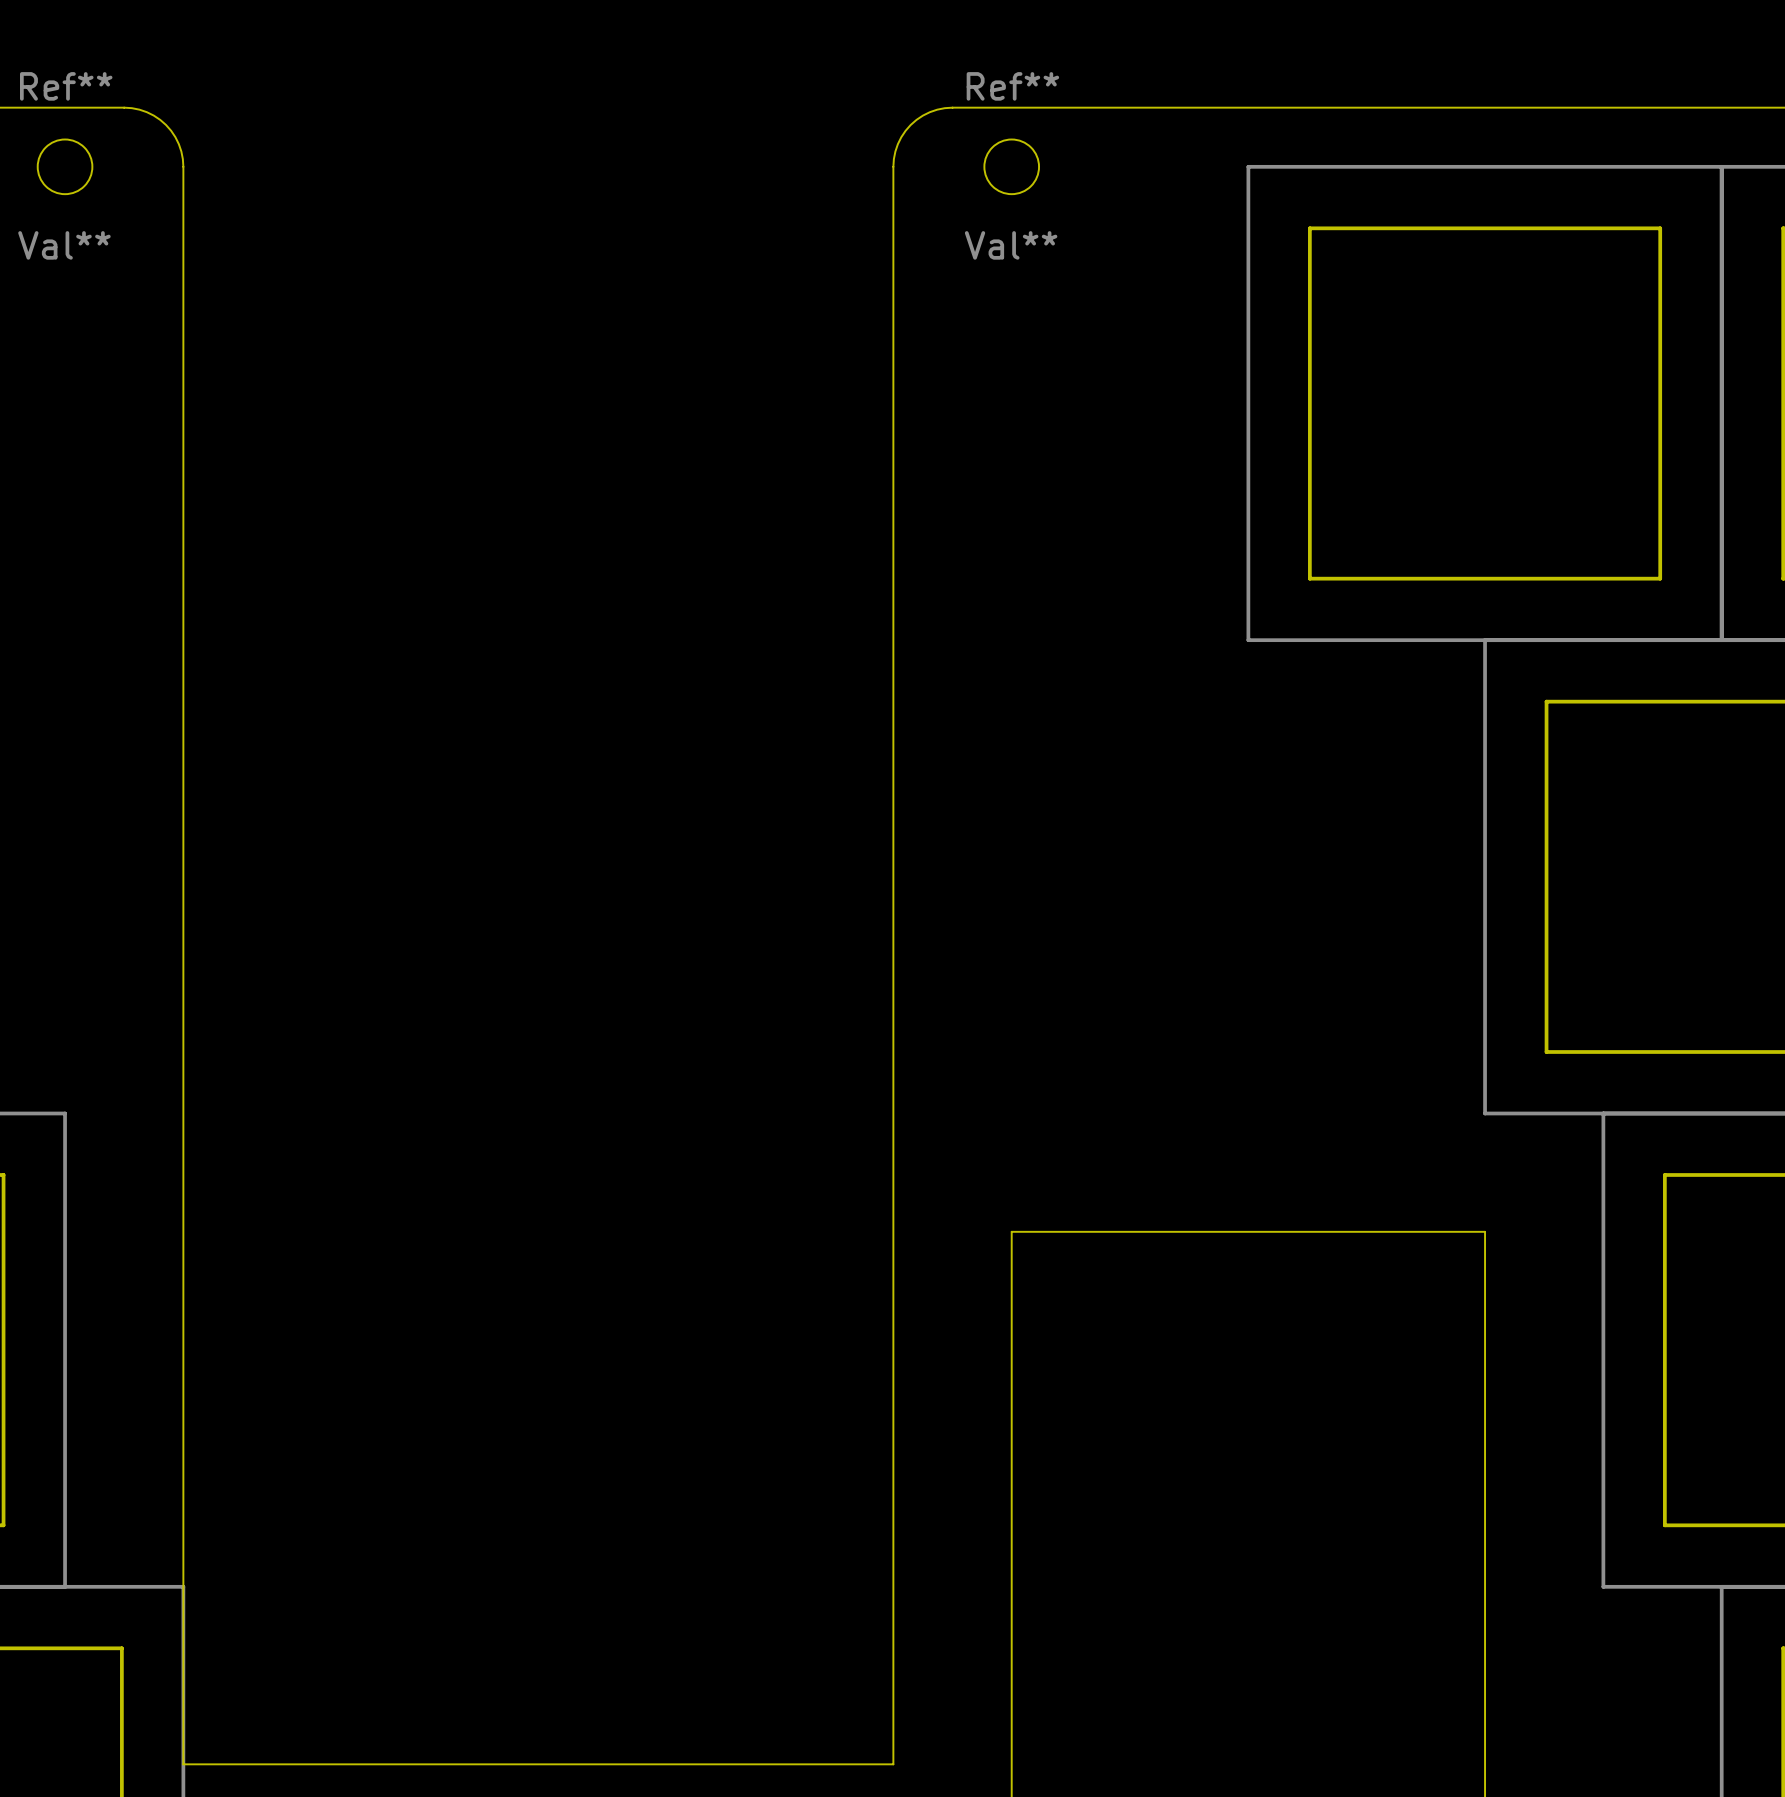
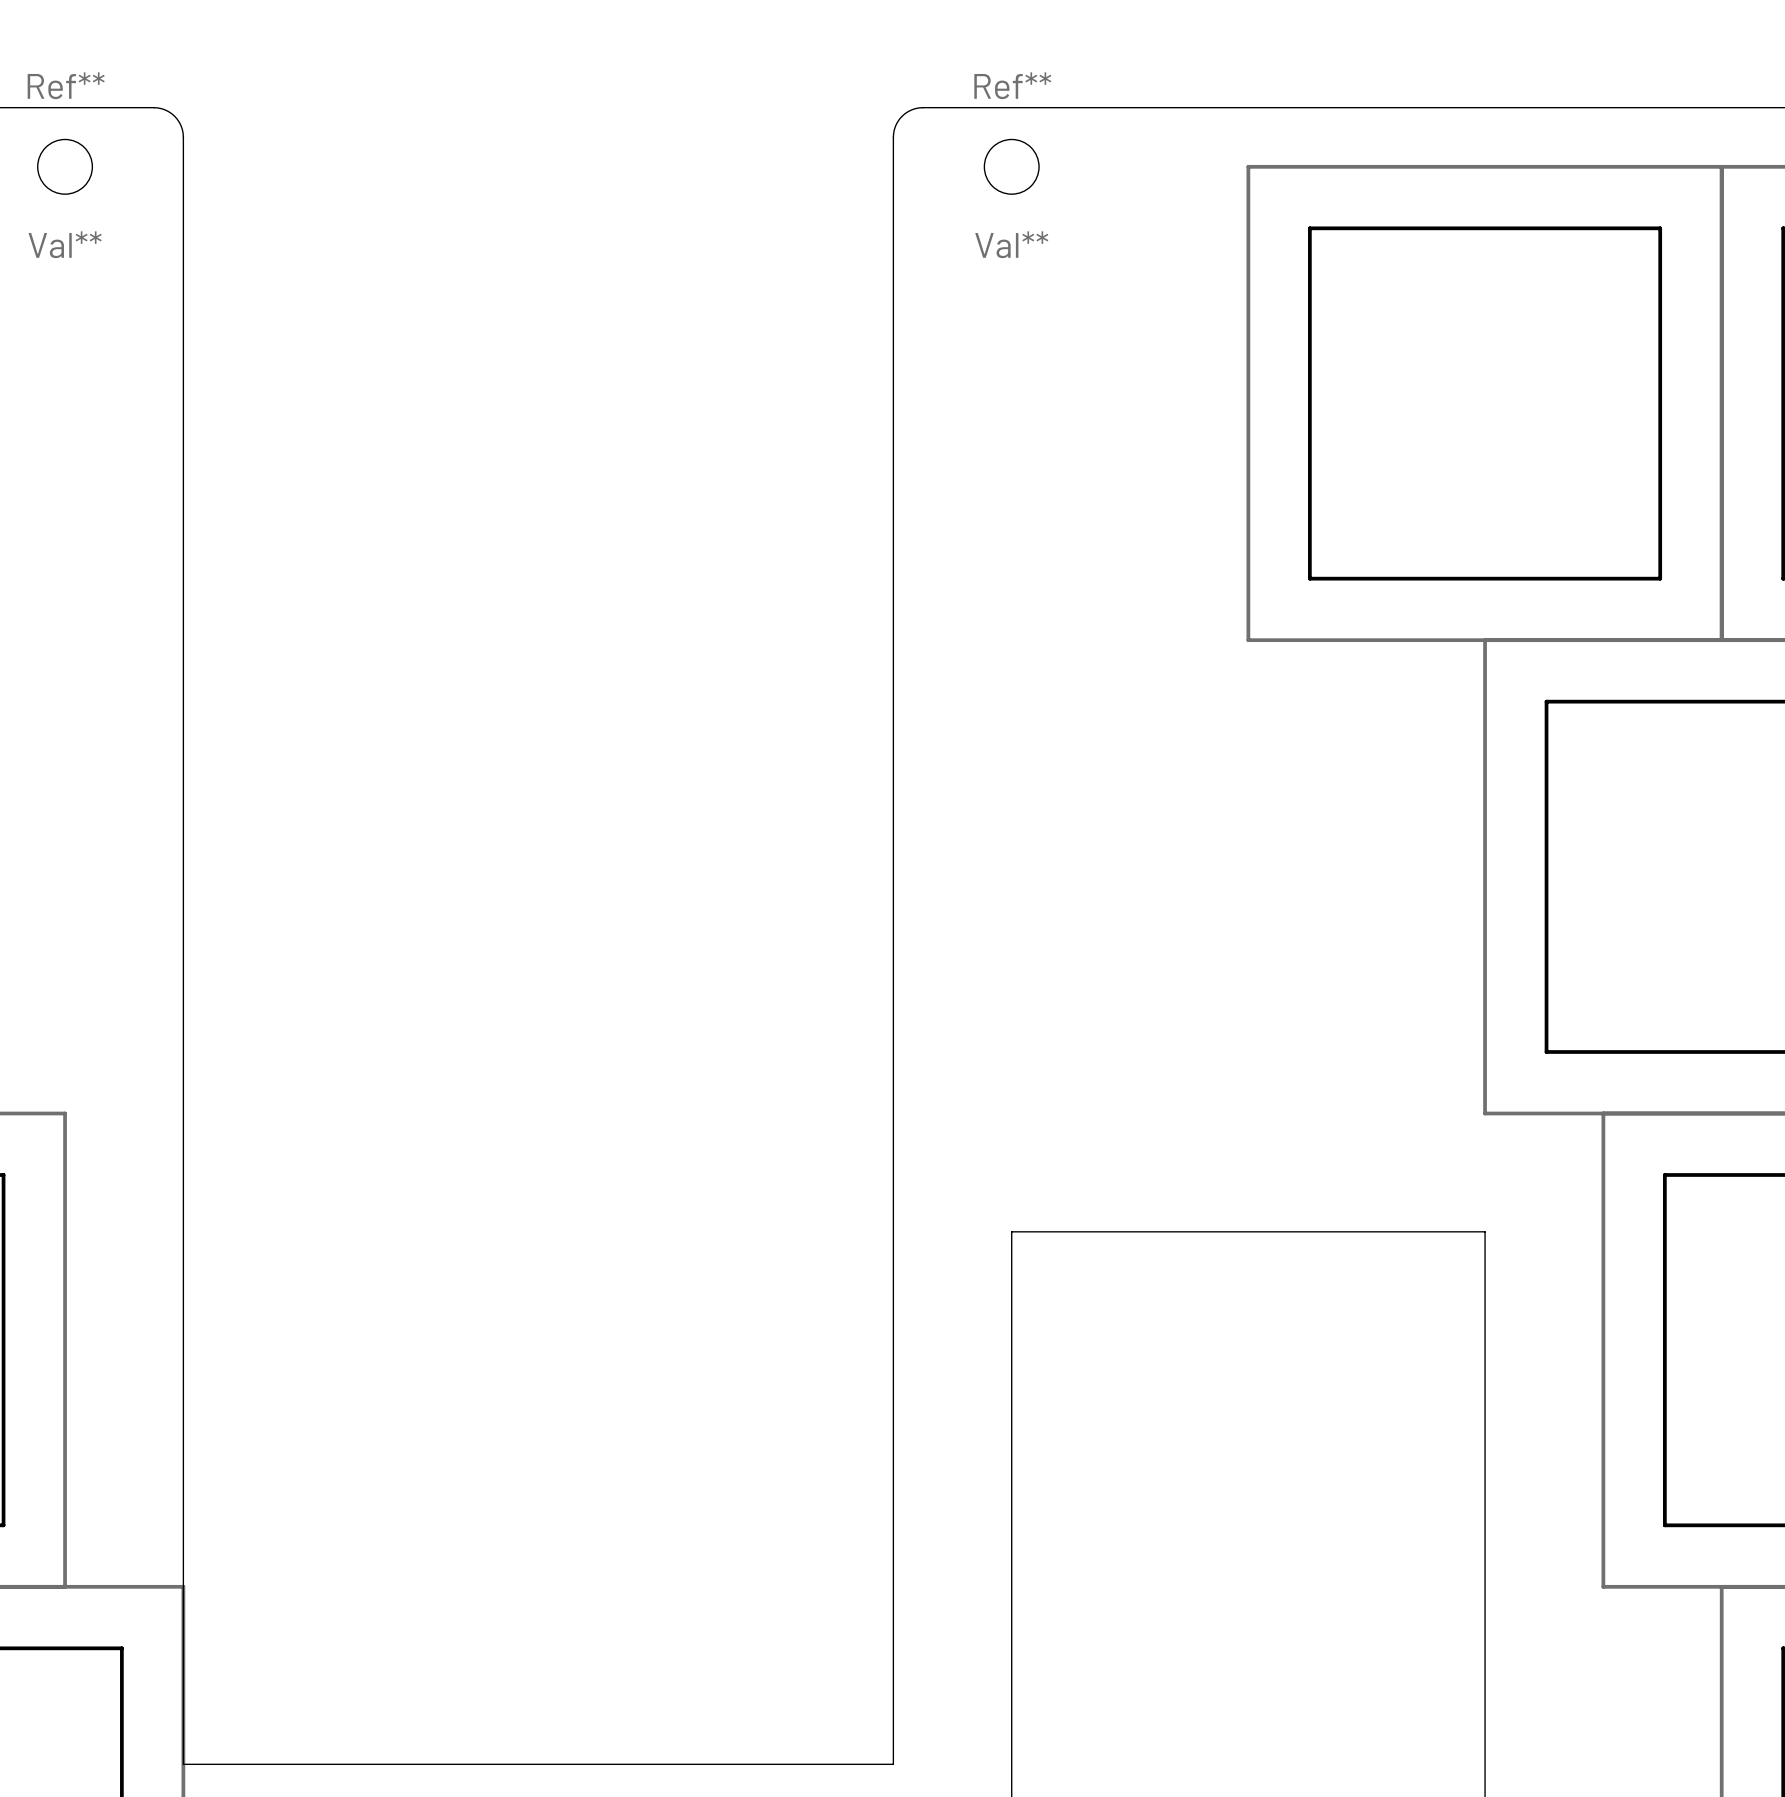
board edge: (124, 107) (146, 112) (166, 124) (178, 144) (183, 166) -> (124, 107) (157, 107) (168, 111) (174, 116) (179, 122) (183, 133) (183, 166)
board edge: (952, 107) (929, 112) (910, 124) (897, 144) (893, 166) -> (952, 107) (919, 107) (911, 109) (902, 116) (897, 122) (893, 133) (893, 166)

